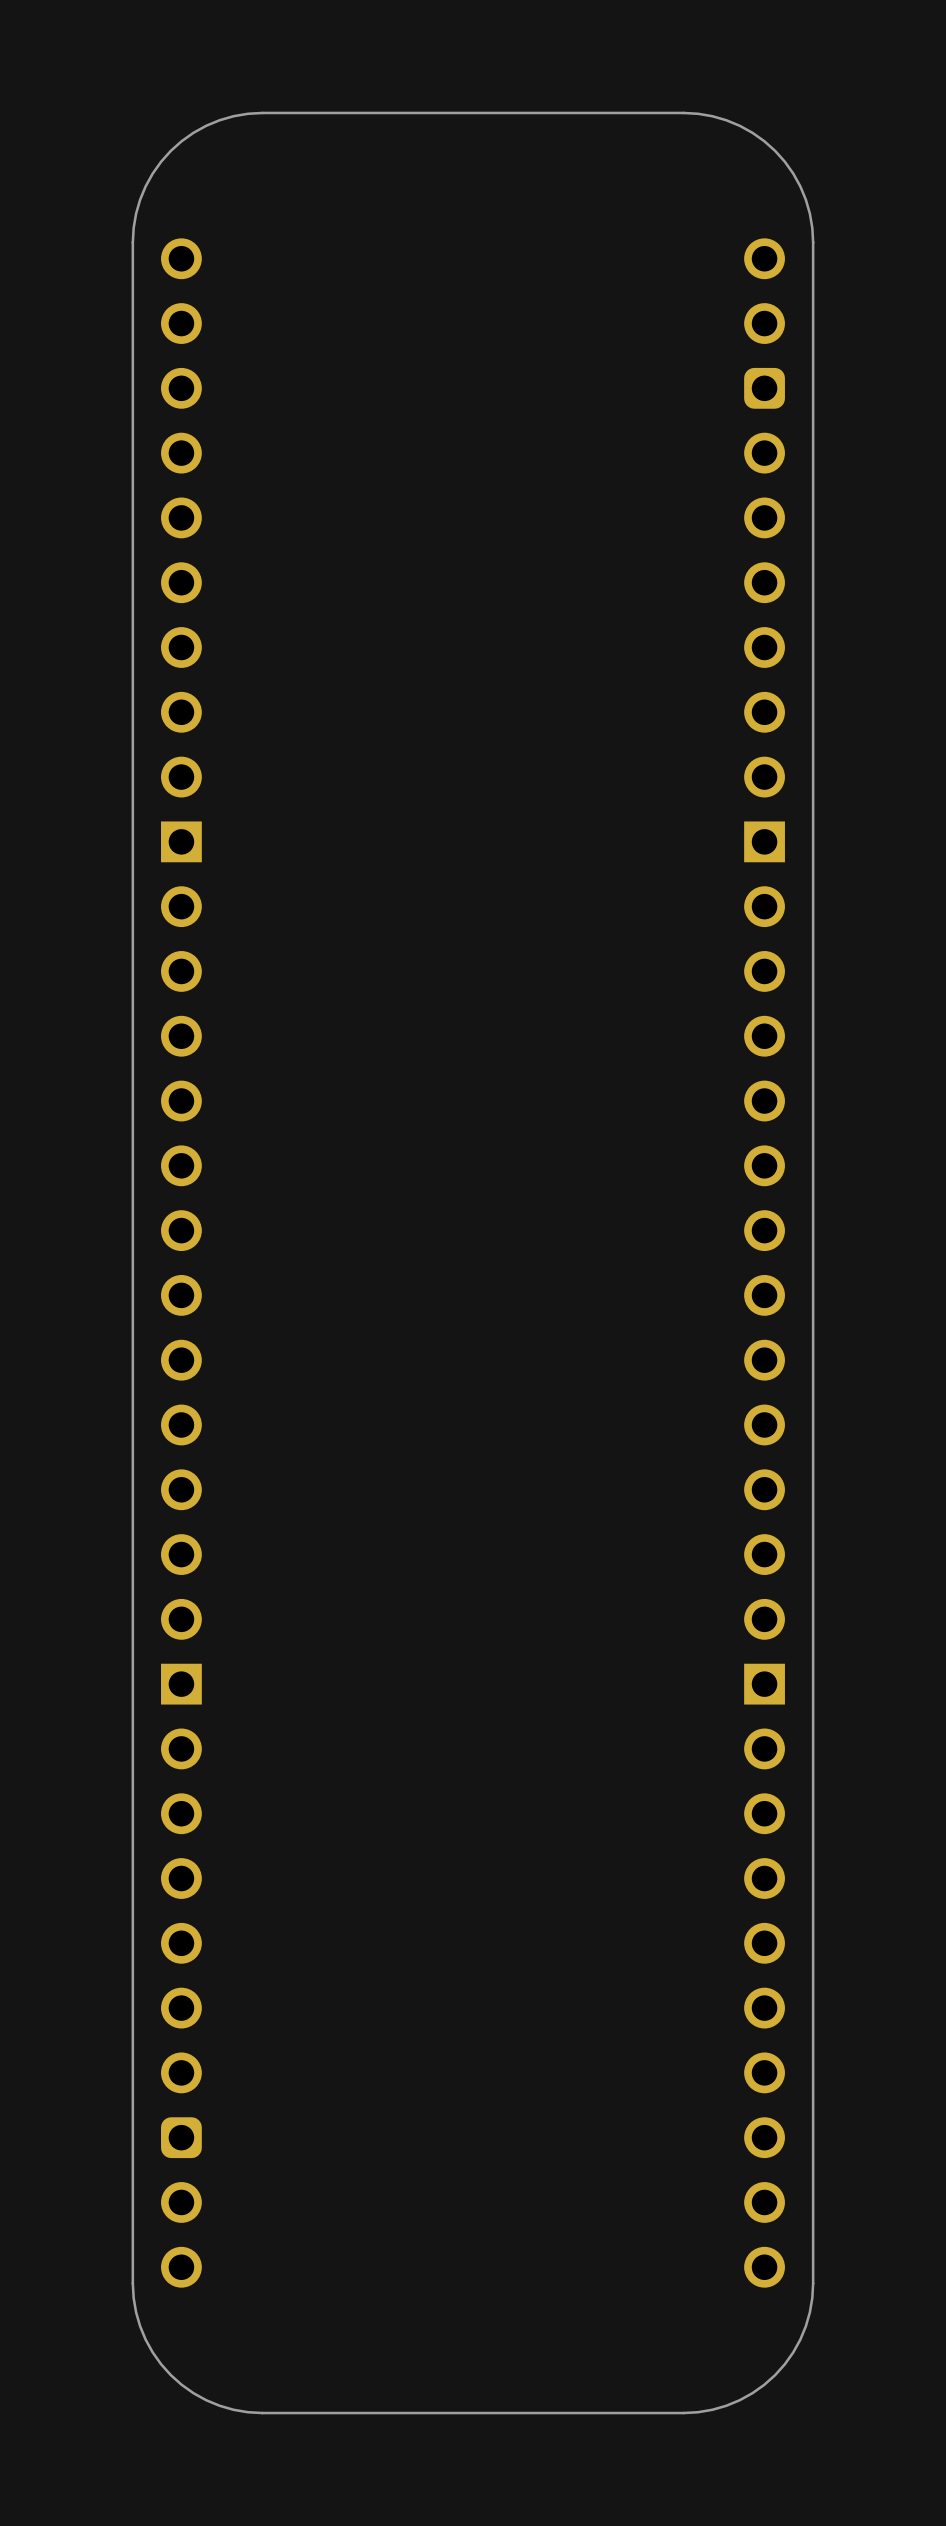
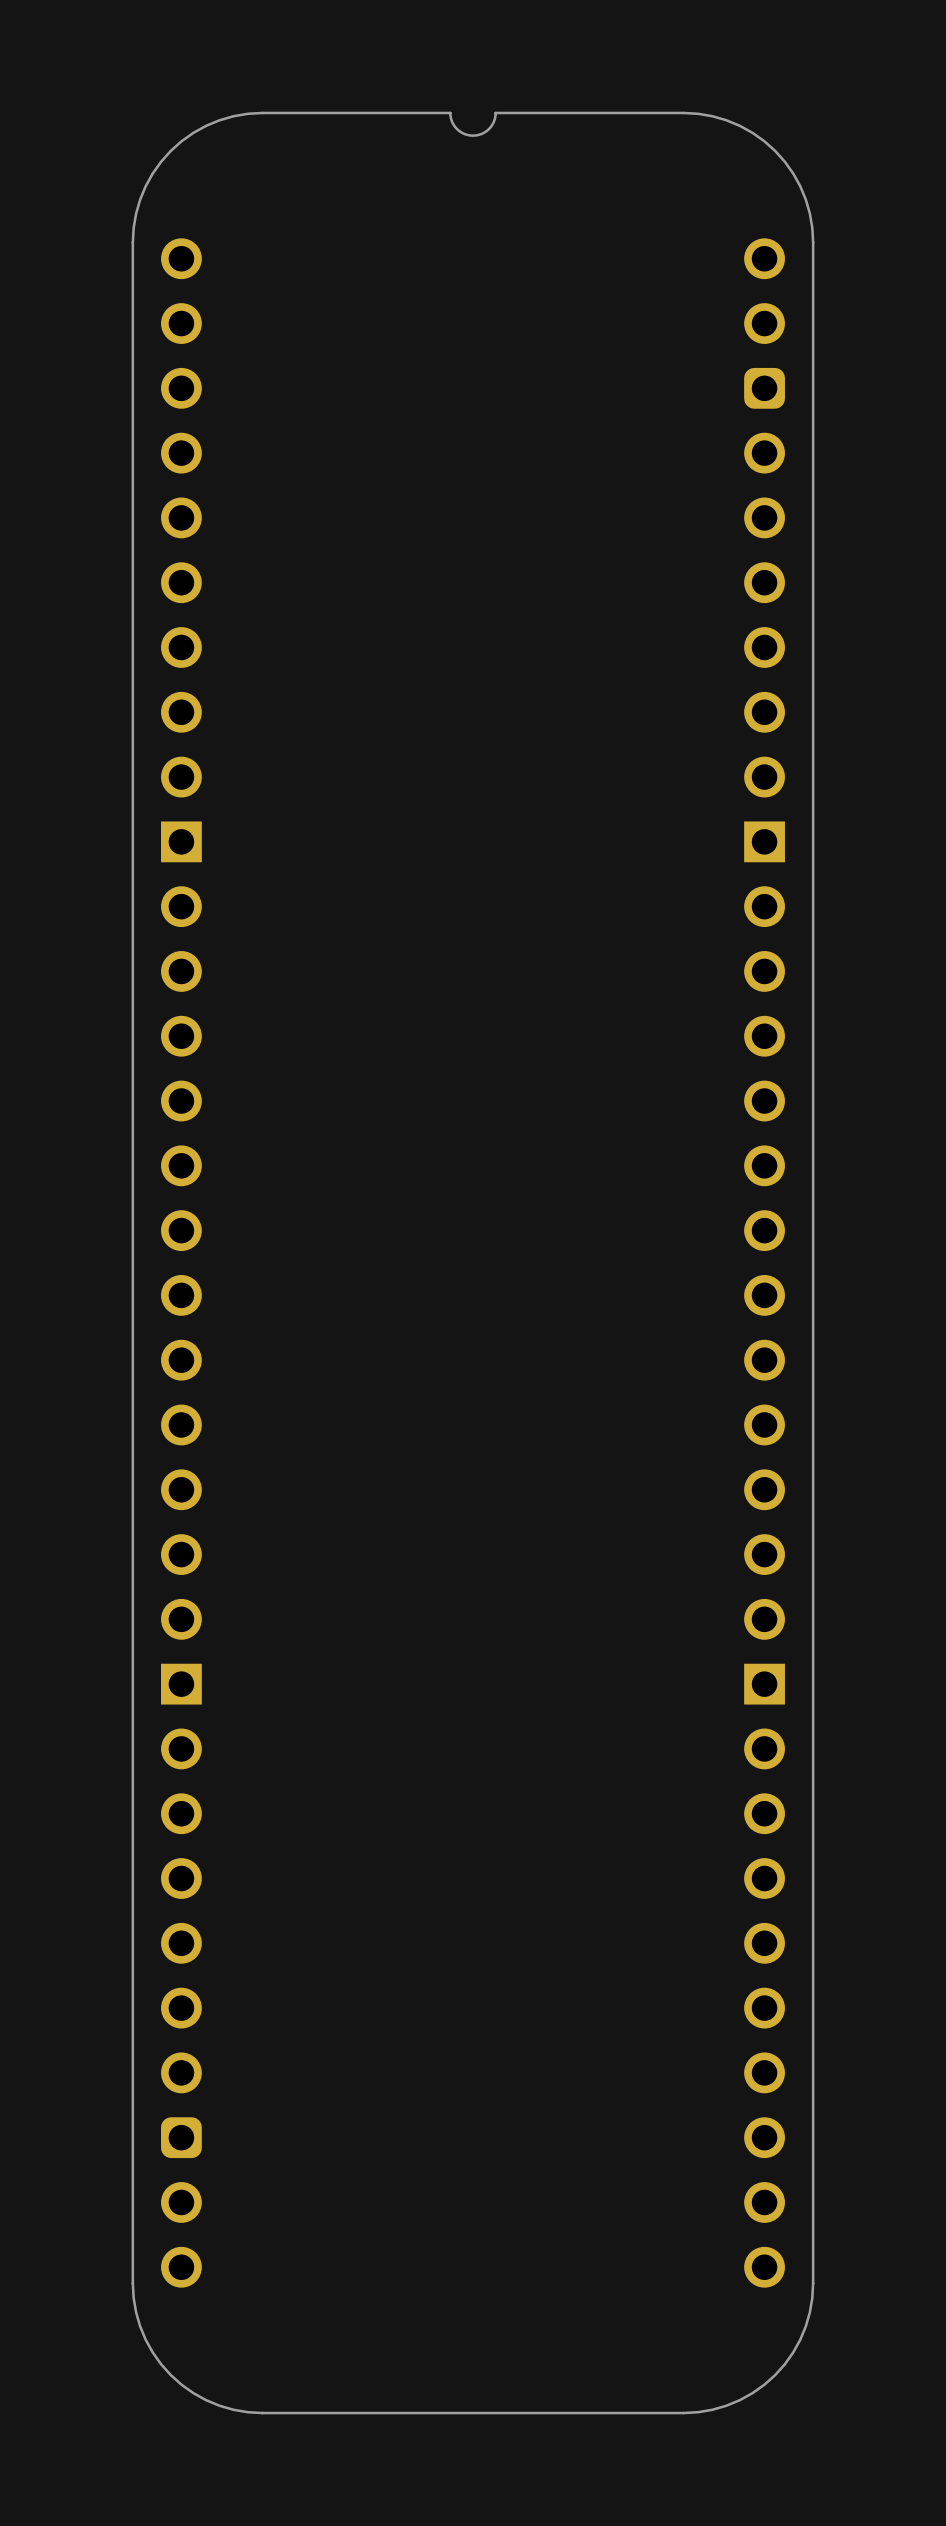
part footprint: [131, 111, 815, 2415] -> [131, 111, 815, 2415]

